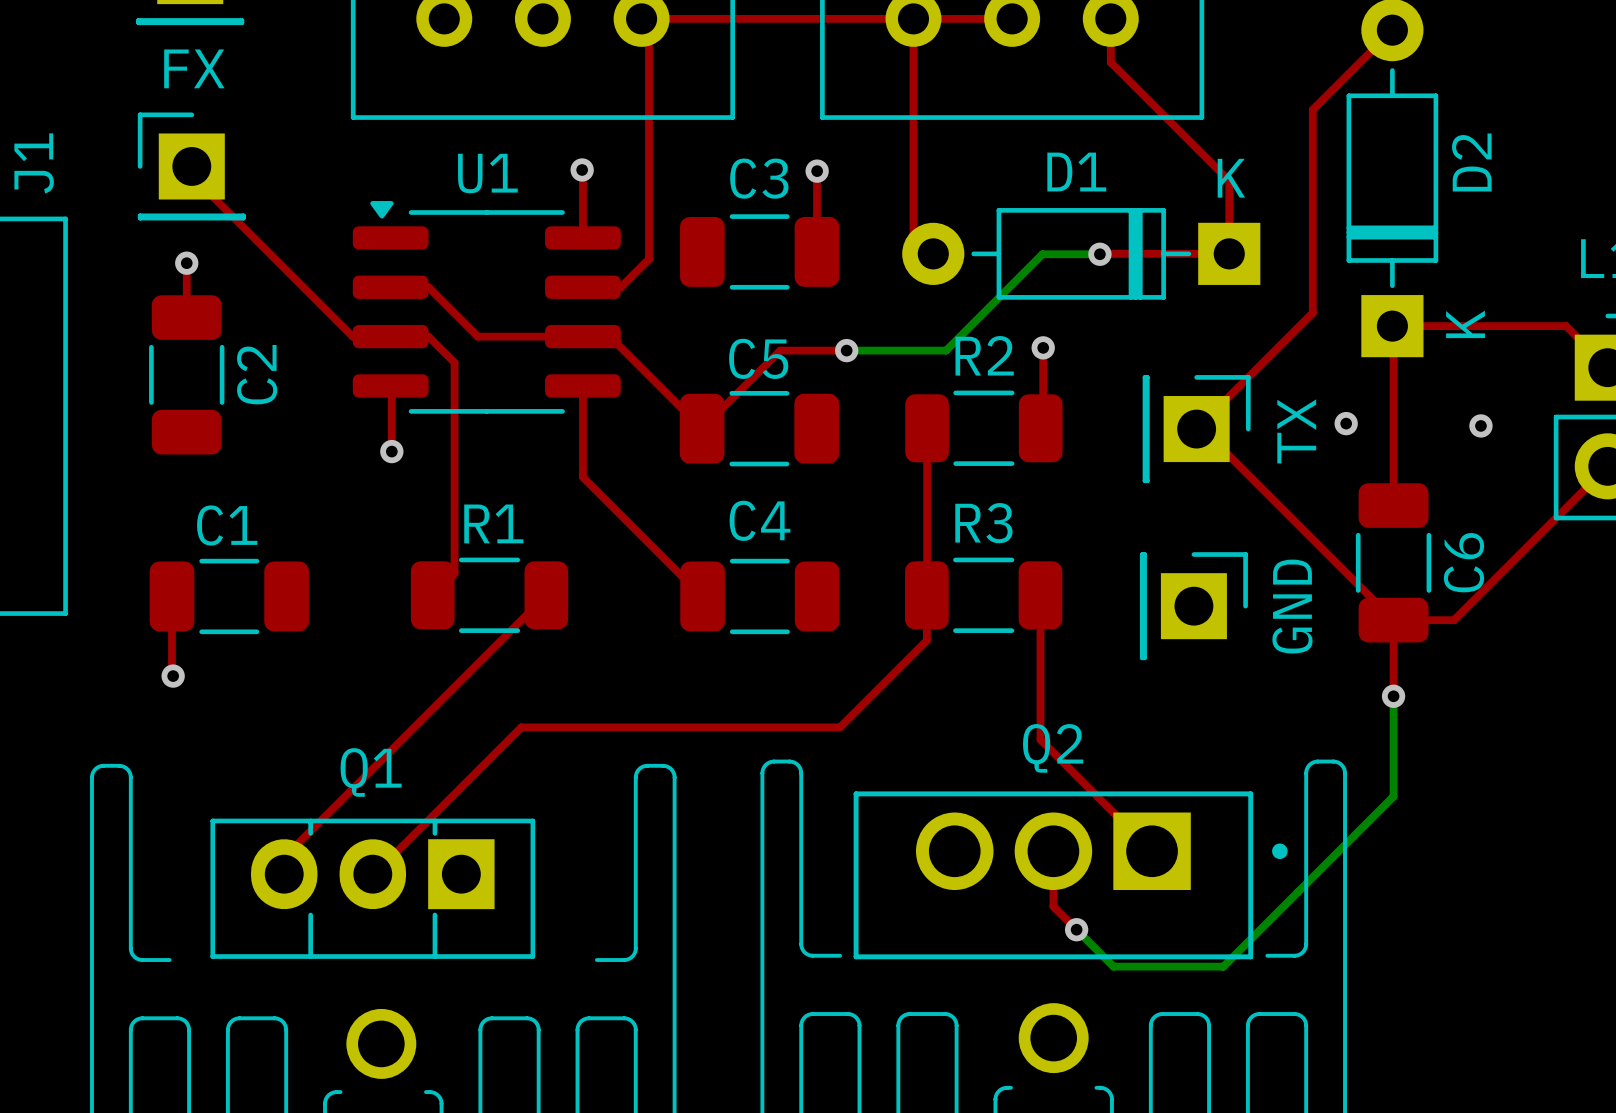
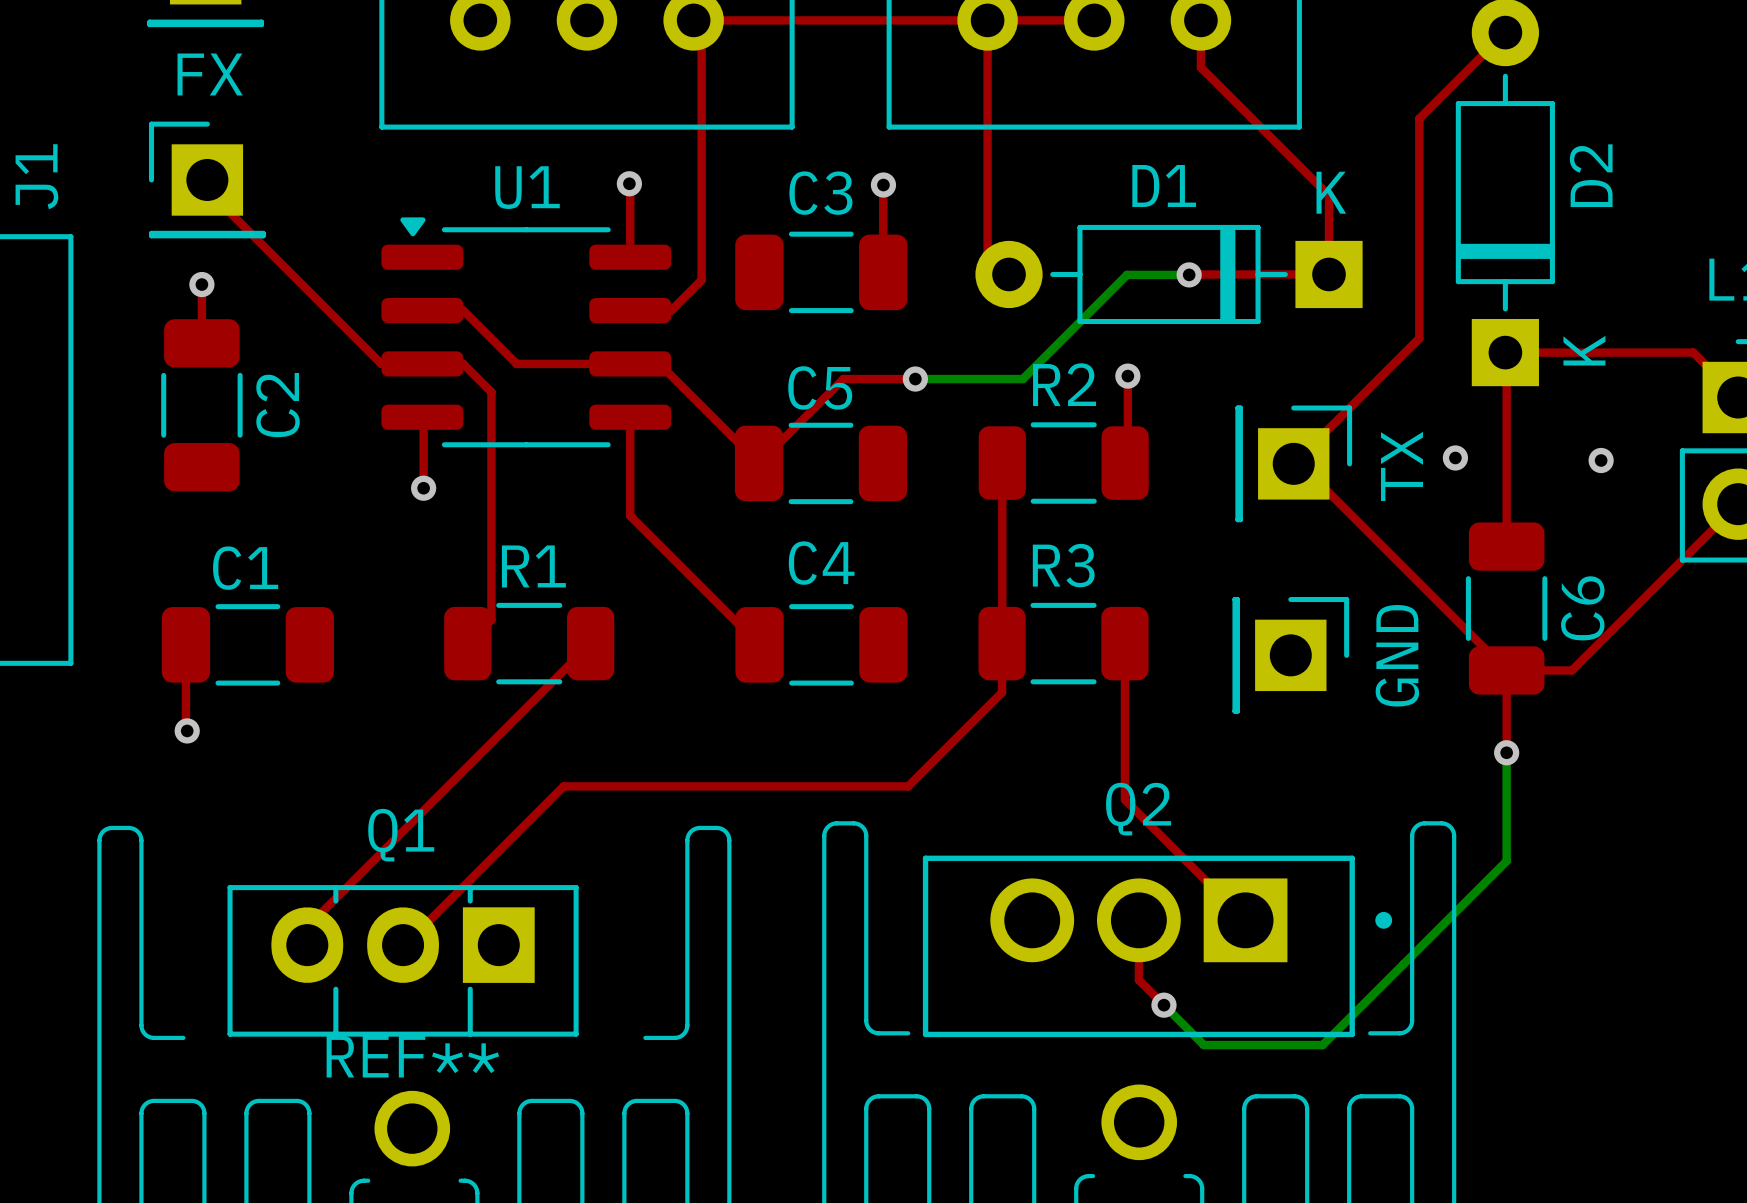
REF** name: none -> REF** (412, 1056)

